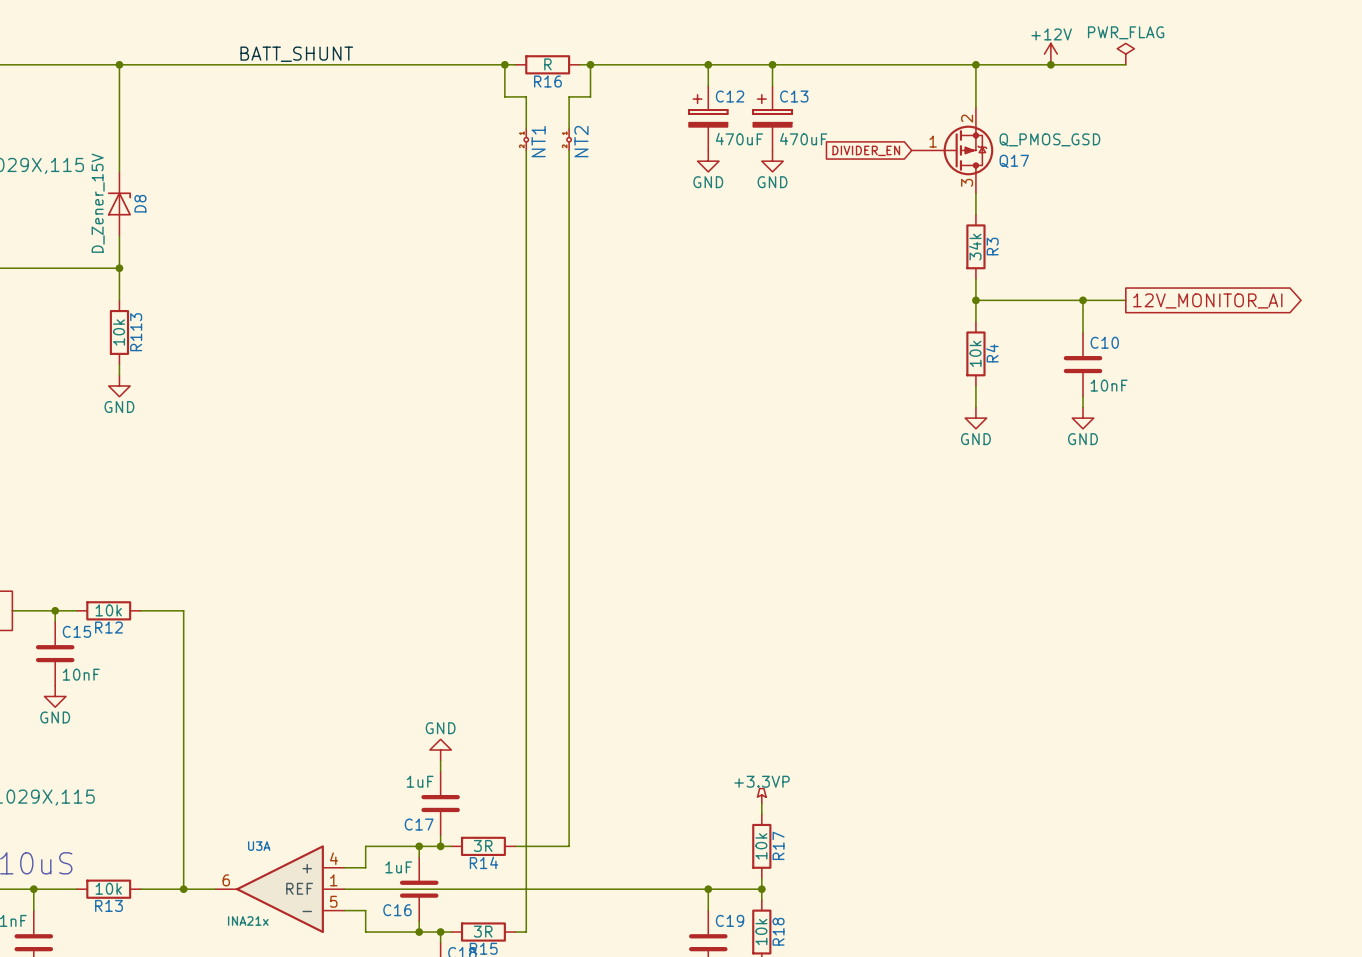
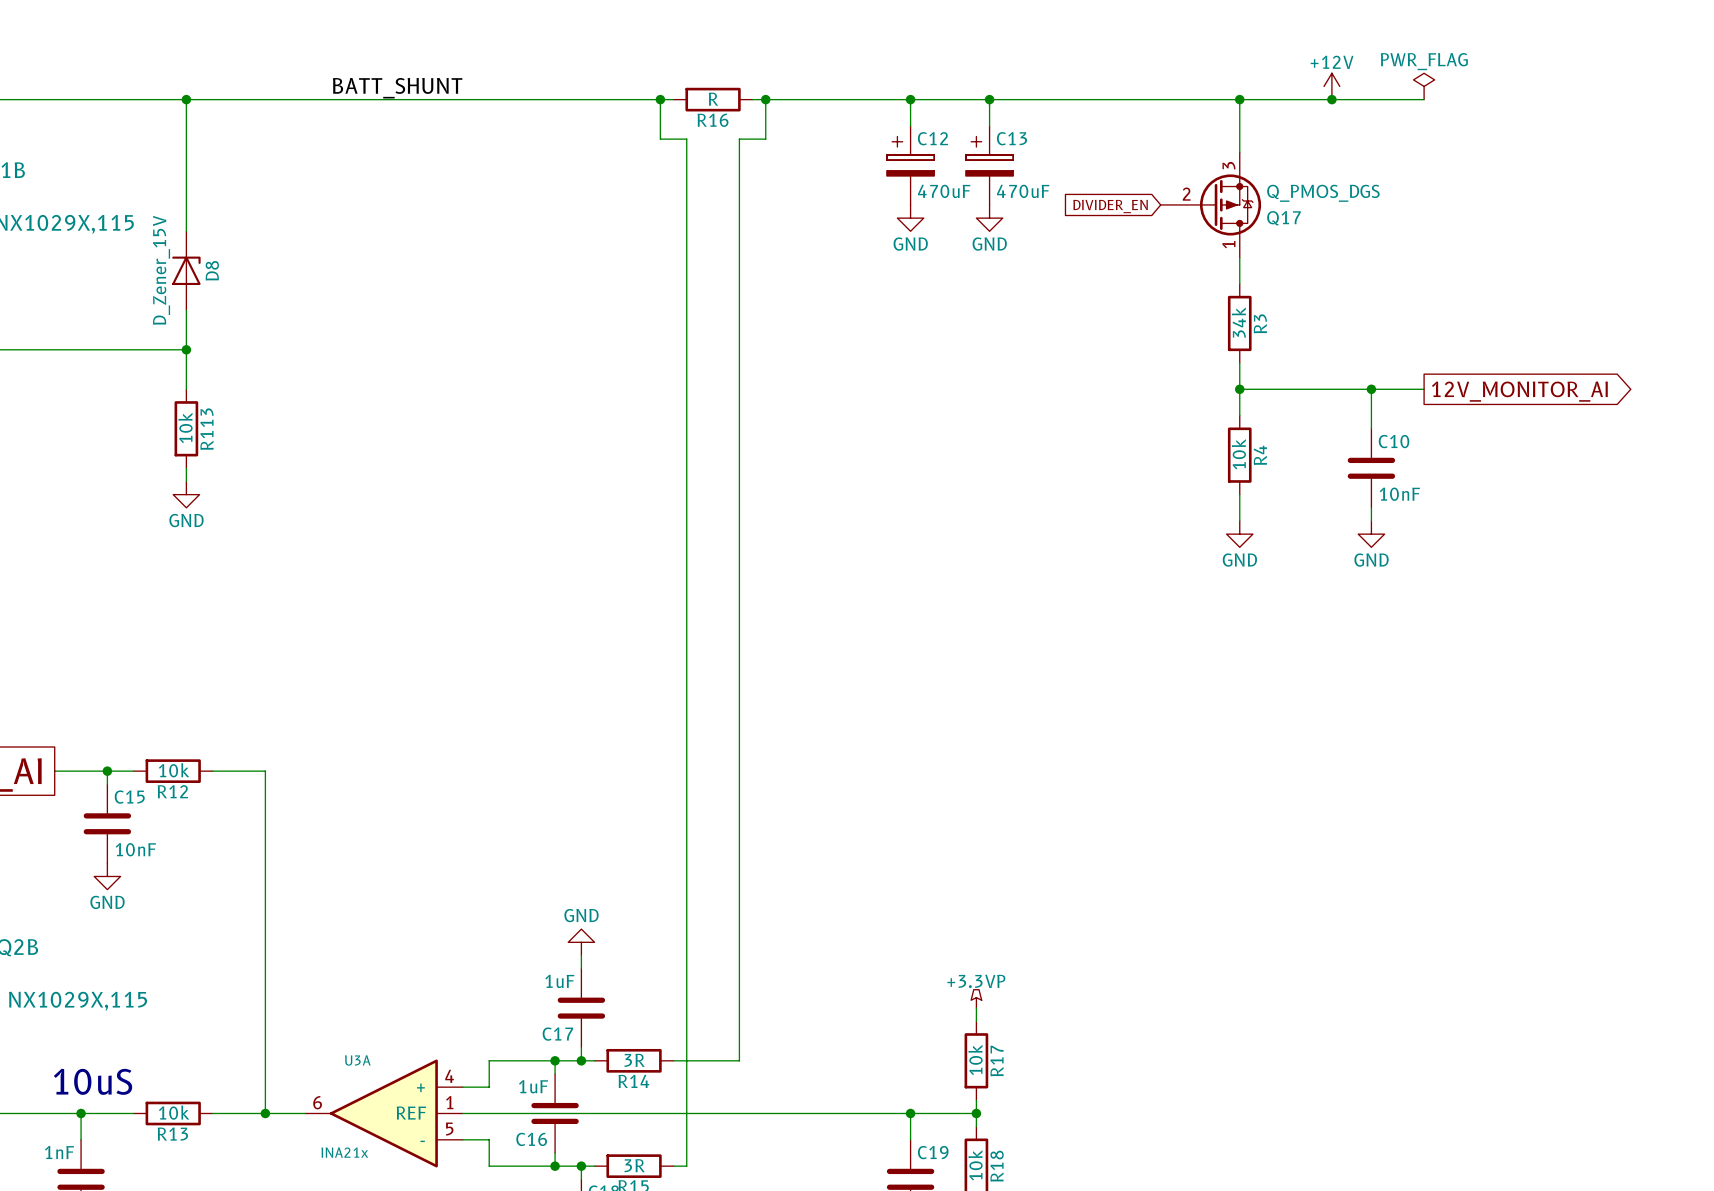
Q17 pin number: 2 (967, 118) -> 3 (1228, 165)
NT1: (526, 139) -> none
NT2: (569, 139) -> none
Q17 value: Q_PMOS_GSD (1049, 139) -> Q_PMOS_DGS (1323, 193)
Q17 pin number: 1 (933, 141) -> 2 (1186, 194)
Q17 pin number: 3 (967, 182) -> 1 (1228, 244)

